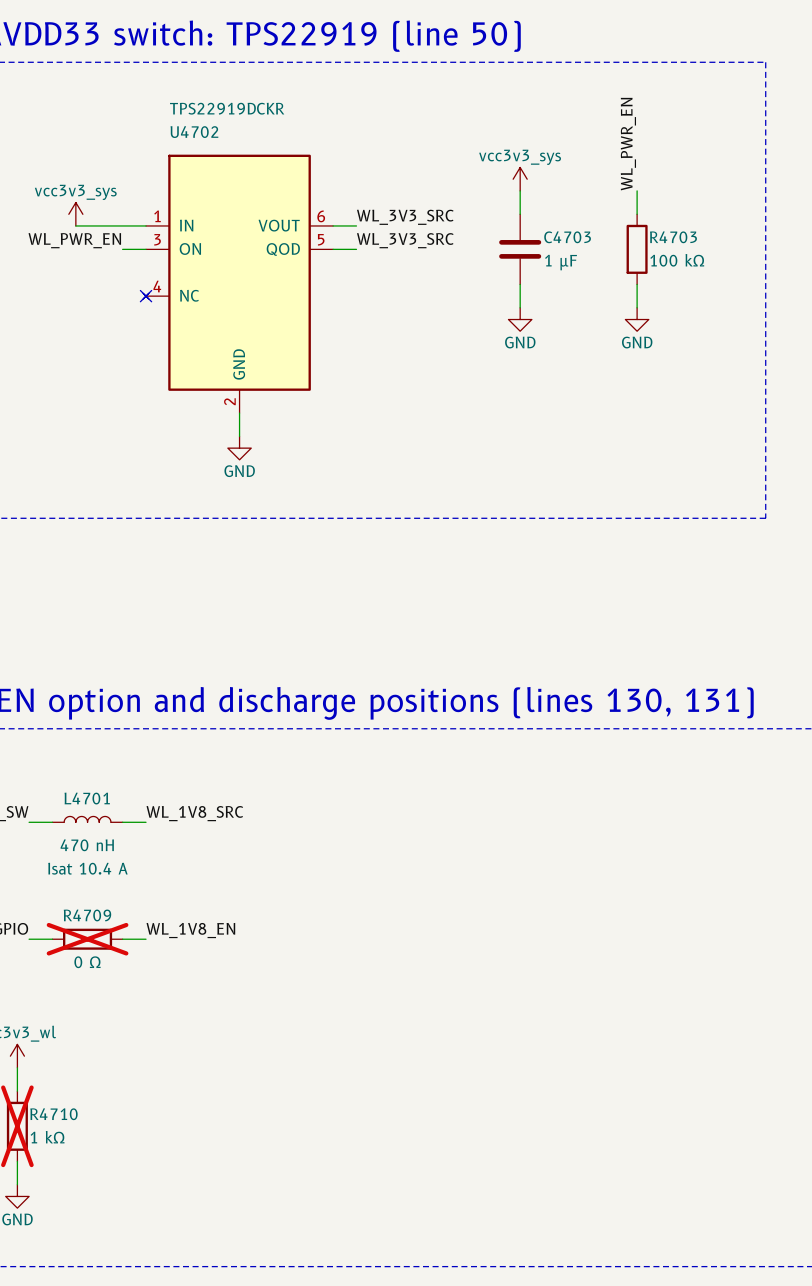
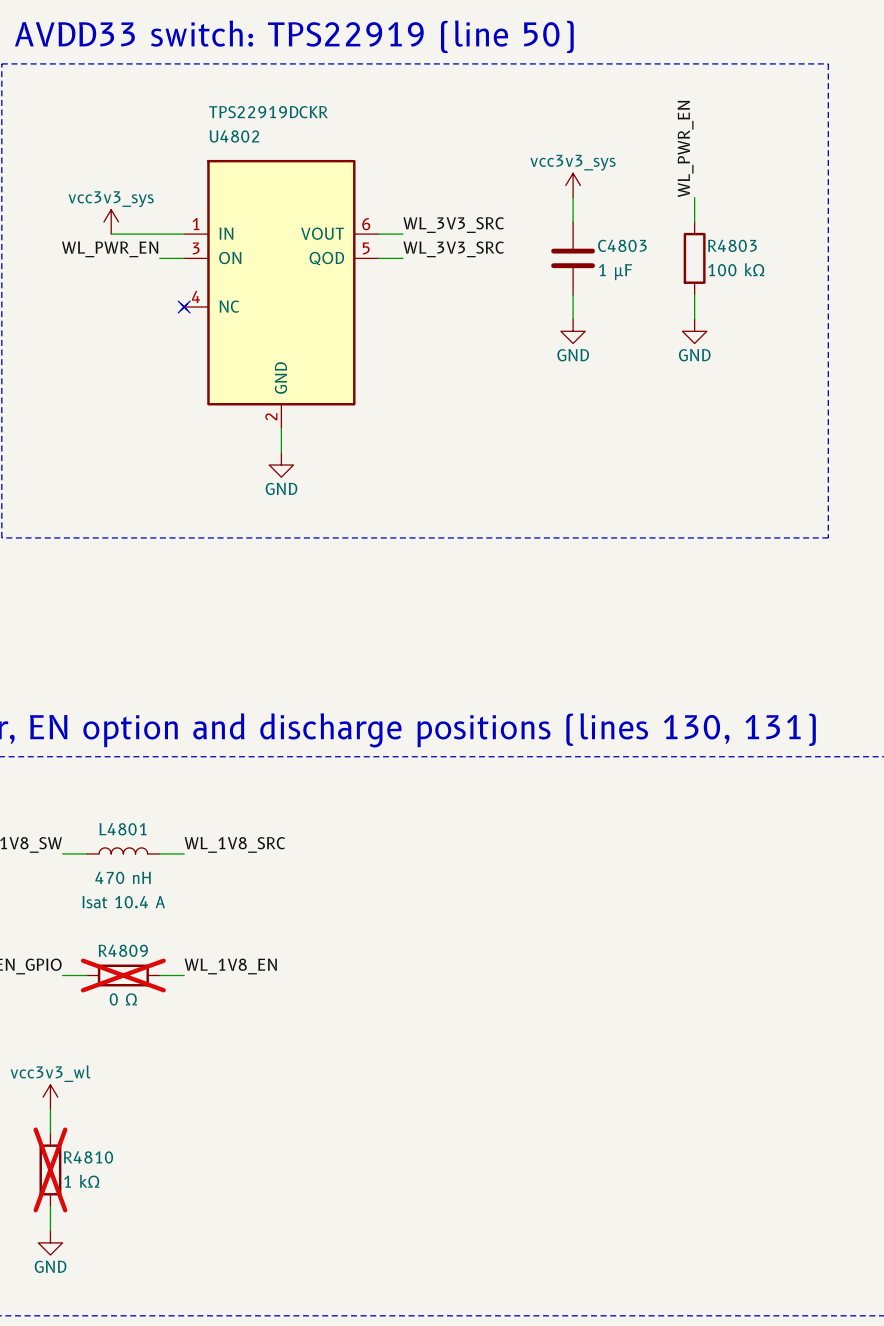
U4702 name: U4702 (194, 132) -> U4802 (234, 136)
C4703 name: C4703 (567, 237) -> C4803 (622, 245)
R4703 name: R4703 (673, 237) -> R4803 (732, 245)
L4701 name: L4701 (87, 798) -> L4801 (123, 829)
R4709 name: R4709 (87, 915) -> R4809 (123, 950)
R4710 name: R4710 (53, 1114) -> R4810 (88, 1157)

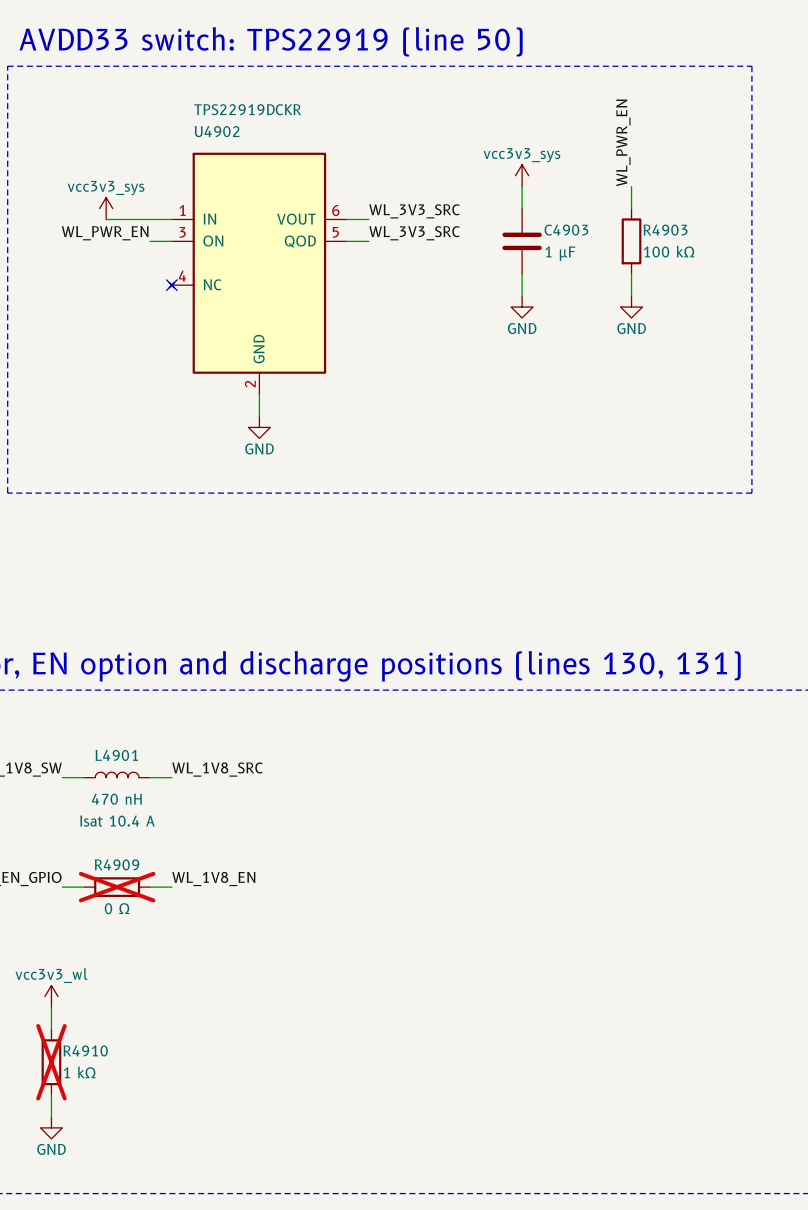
U4802 name: U4802 (234, 136) -> U4902 (217, 131)
C4803 name: C4803 (622, 245) -> C4903 (566, 230)
R4803 name: R4803 (732, 245) -> R4903 (665, 230)
L4801 name: L4801 (123, 829) -> L4901 (116, 755)
R4809 name: R4809 (123, 950) -> R4909 (117, 864)
R4810 name: R4810 (88, 1157) -> R4910 (85, 1050)

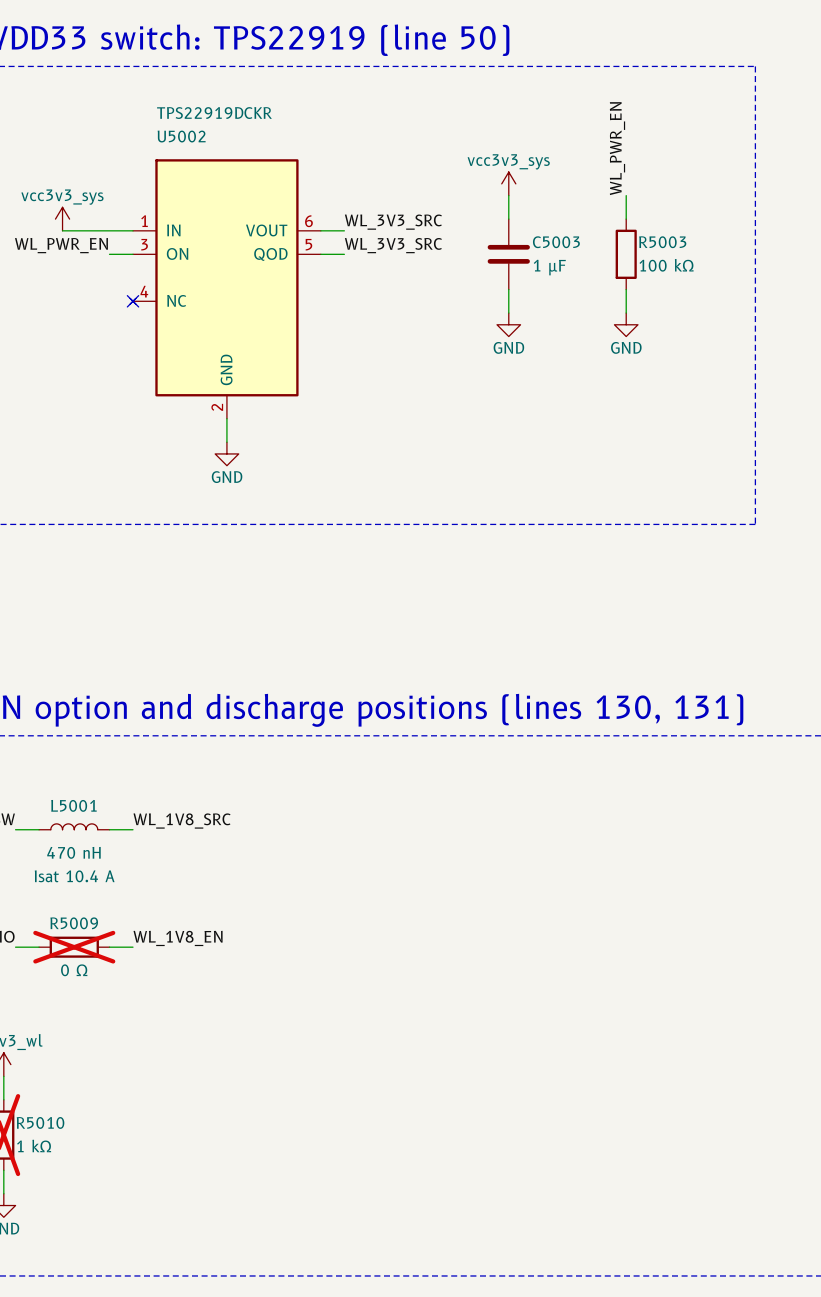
U4902 name: U4902 (217, 131) -> U5002 (181, 136)
C4903 name: C4903 (566, 230) -> C5003 (556, 242)
R4903 name: R4903 (665, 230) -> R5003 (662, 242)
L4901 name: L4901 (116, 755) -> L5001 (73, 805)
R4909 name: R4909 (117, 864) -> R5009 (74, 923)
R4910 name: R4910 (85, 1050) -> R5010 (40, 1122)

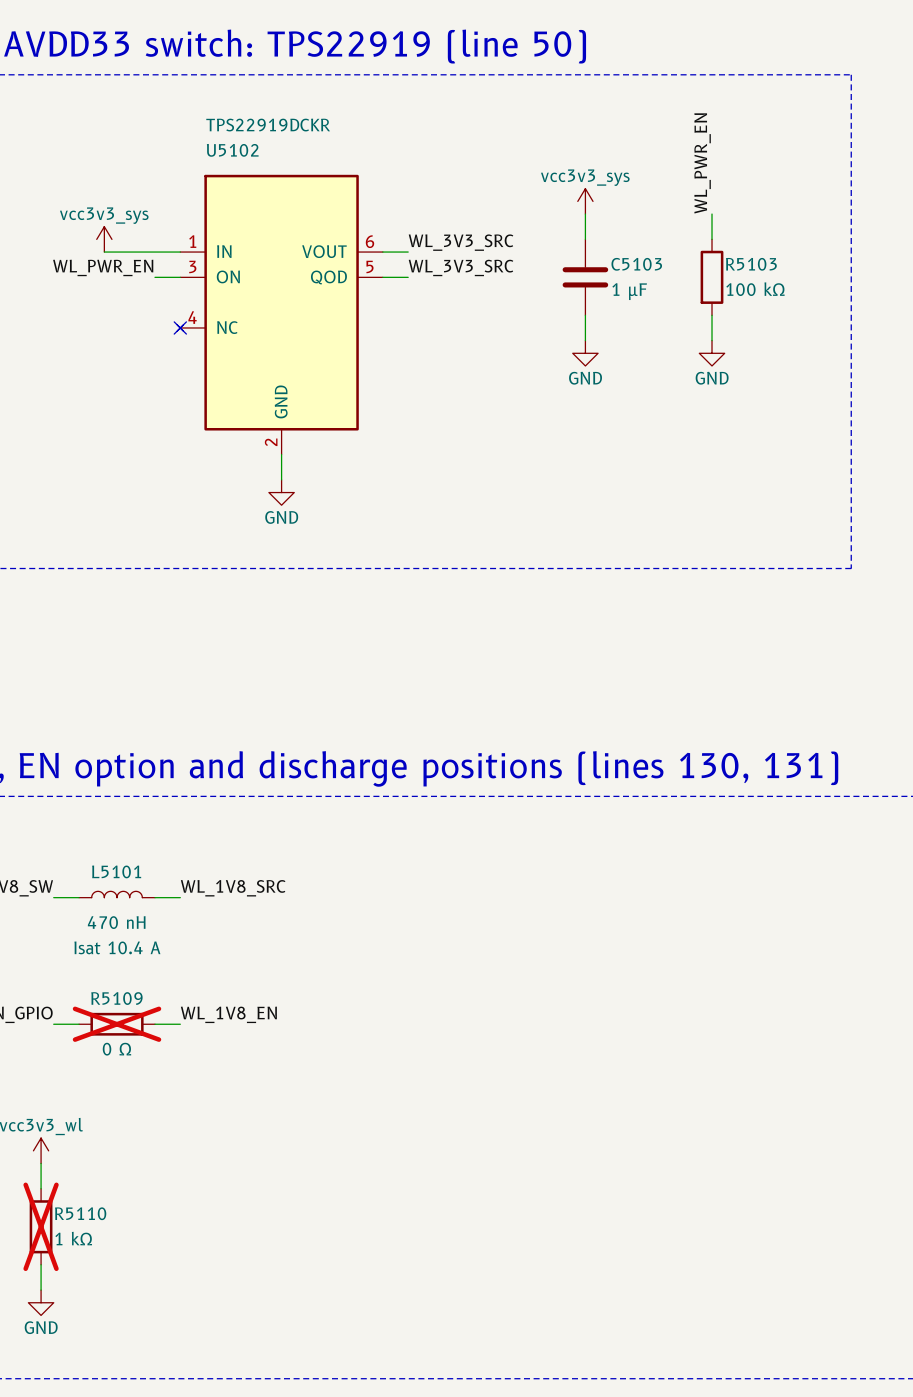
U5002 name: U5002 (181, 136) -> U5102 (232, 150)
C5003 name: C5003 (556, 242) -> C5103 (636, 264)
R5003 name: R5003 (662, 242) -> R5103 (751, 264)
L5001 name: L5001 (73, 805) -> L5101 (116, 871)
R5009 name: R5009 (74, 923) -> R5109 (116, 998)
R5010 name: R5010 (40, 1122) -> R5110 (80, 1213)

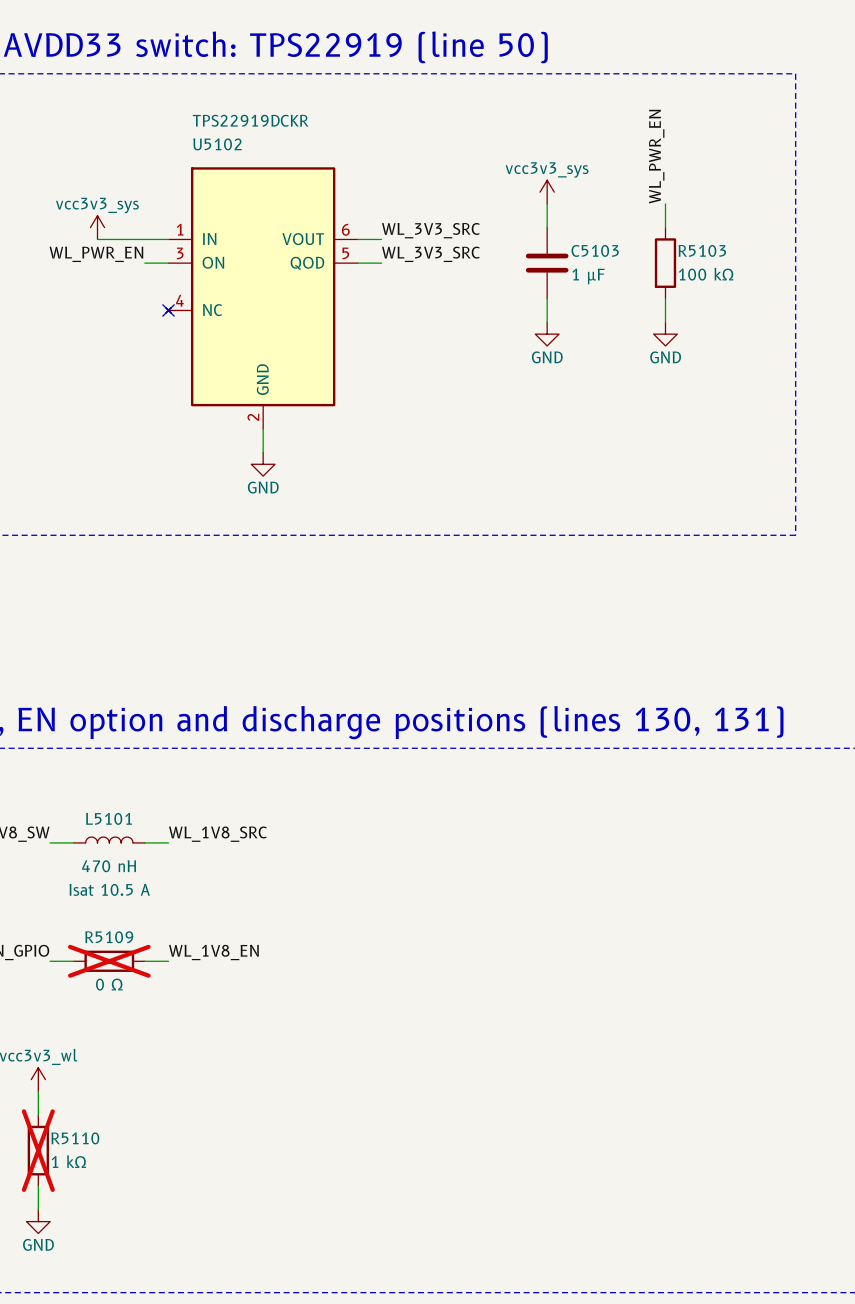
L5101 text: Isat 10.4 A (117, 947) -> Isat 10.5 A (109, 889)

